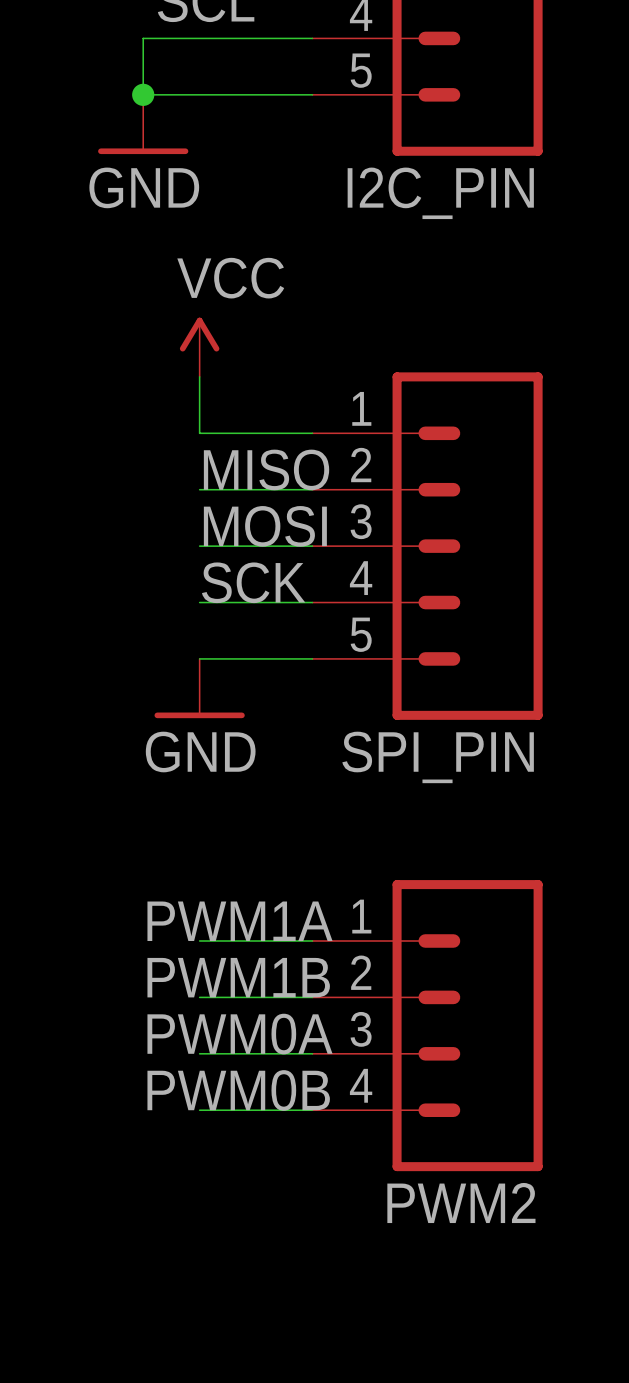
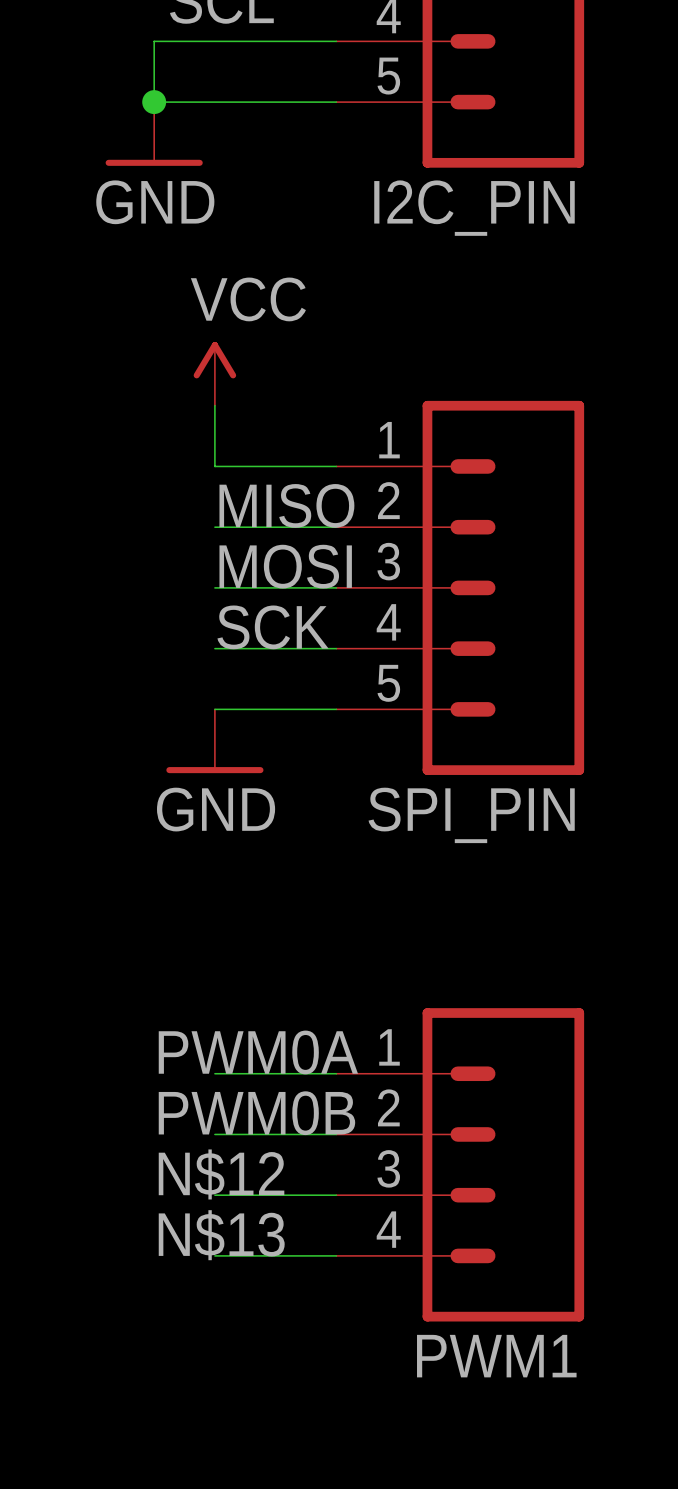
label: PWM1A (240, 921) -> none
wire: (199, 940) (312, 940) -> (214, 1255) (336, 1255)
label: PWM1B (238, 977) -> PWM0A (258, 1052)
PWM2: (427, 1025) -> none
label: PWM0A (240, 1034) -> PWM0B (256, 1113)
PWM1: none -> (460, 1164)
label: PWM0B (238, 1090) -> N$12 (221, 1174)
label: none -> N$13 (221, 1235)

